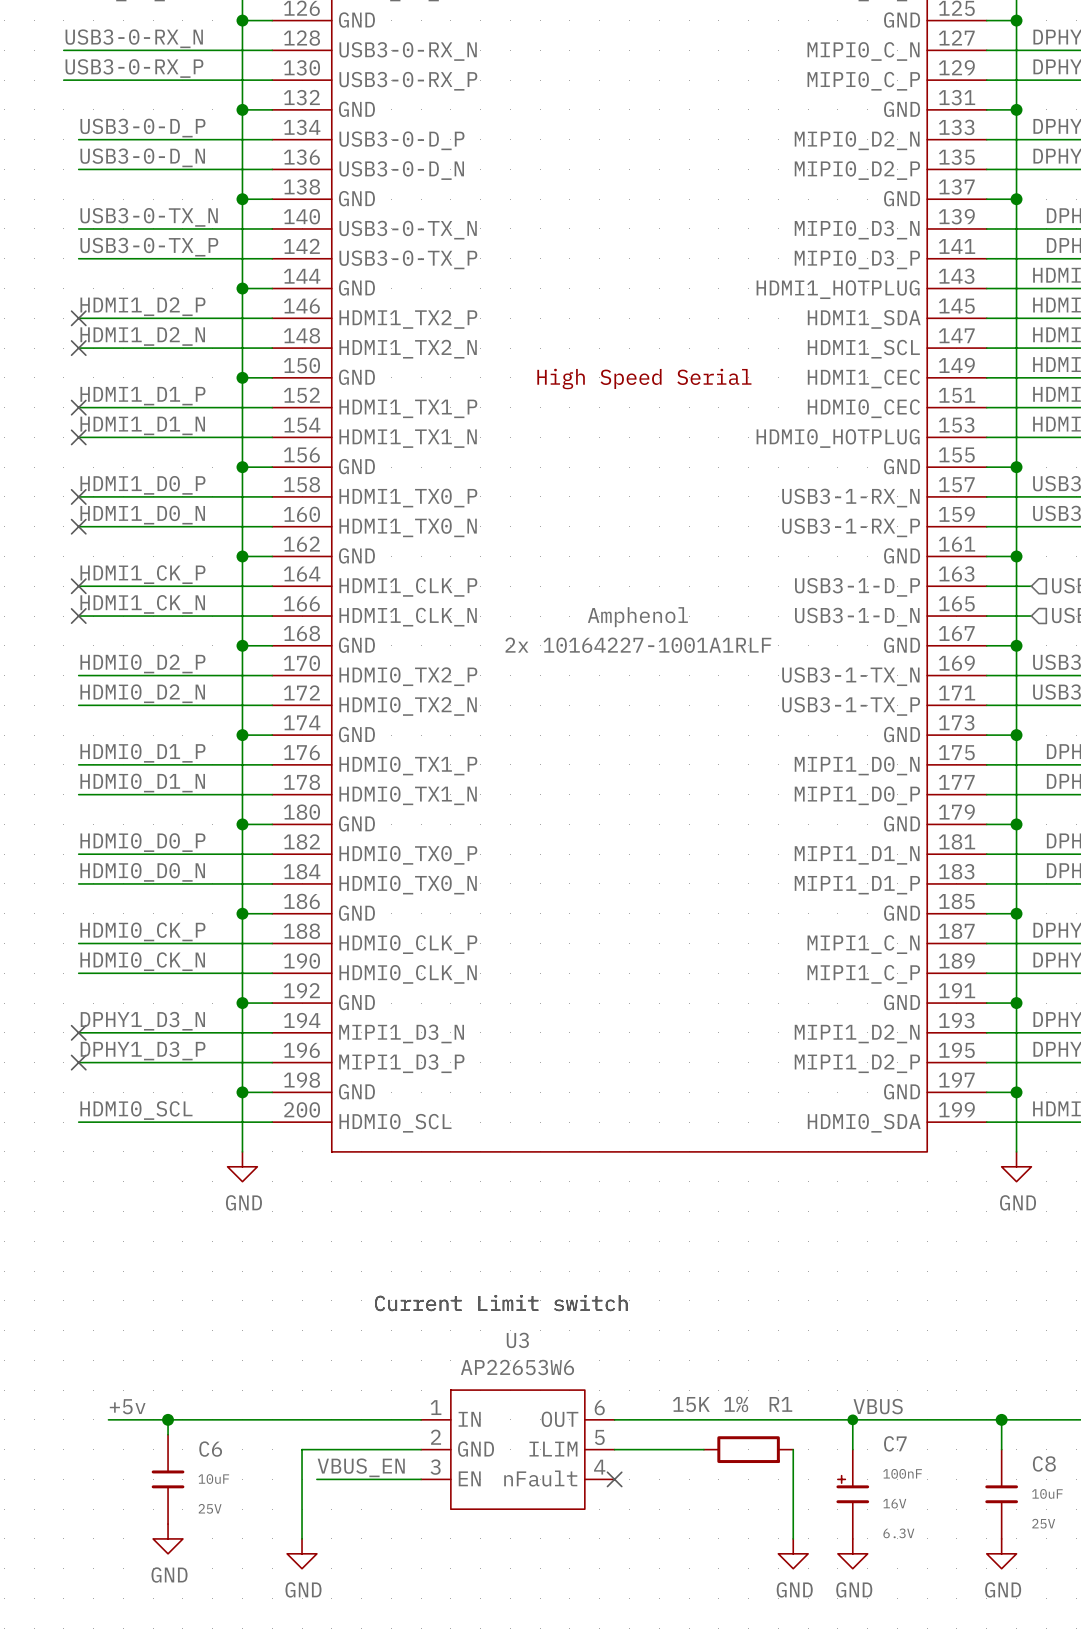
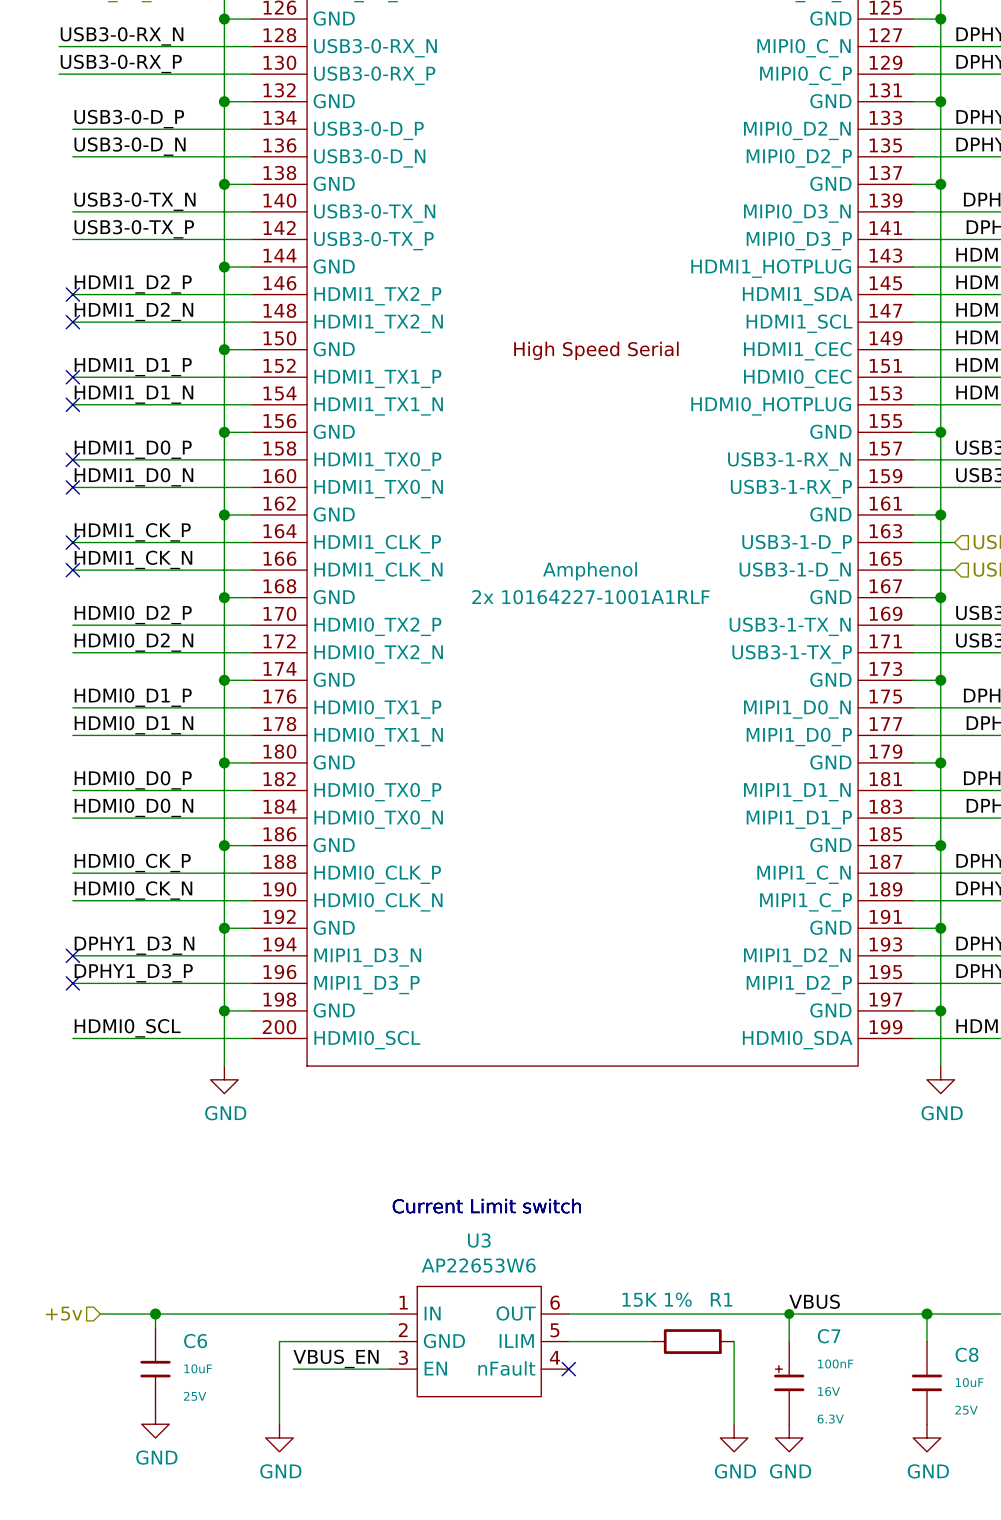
label: +5v (127, 1406) -> none
hierarchical label: none -> +5v (64, 1313)

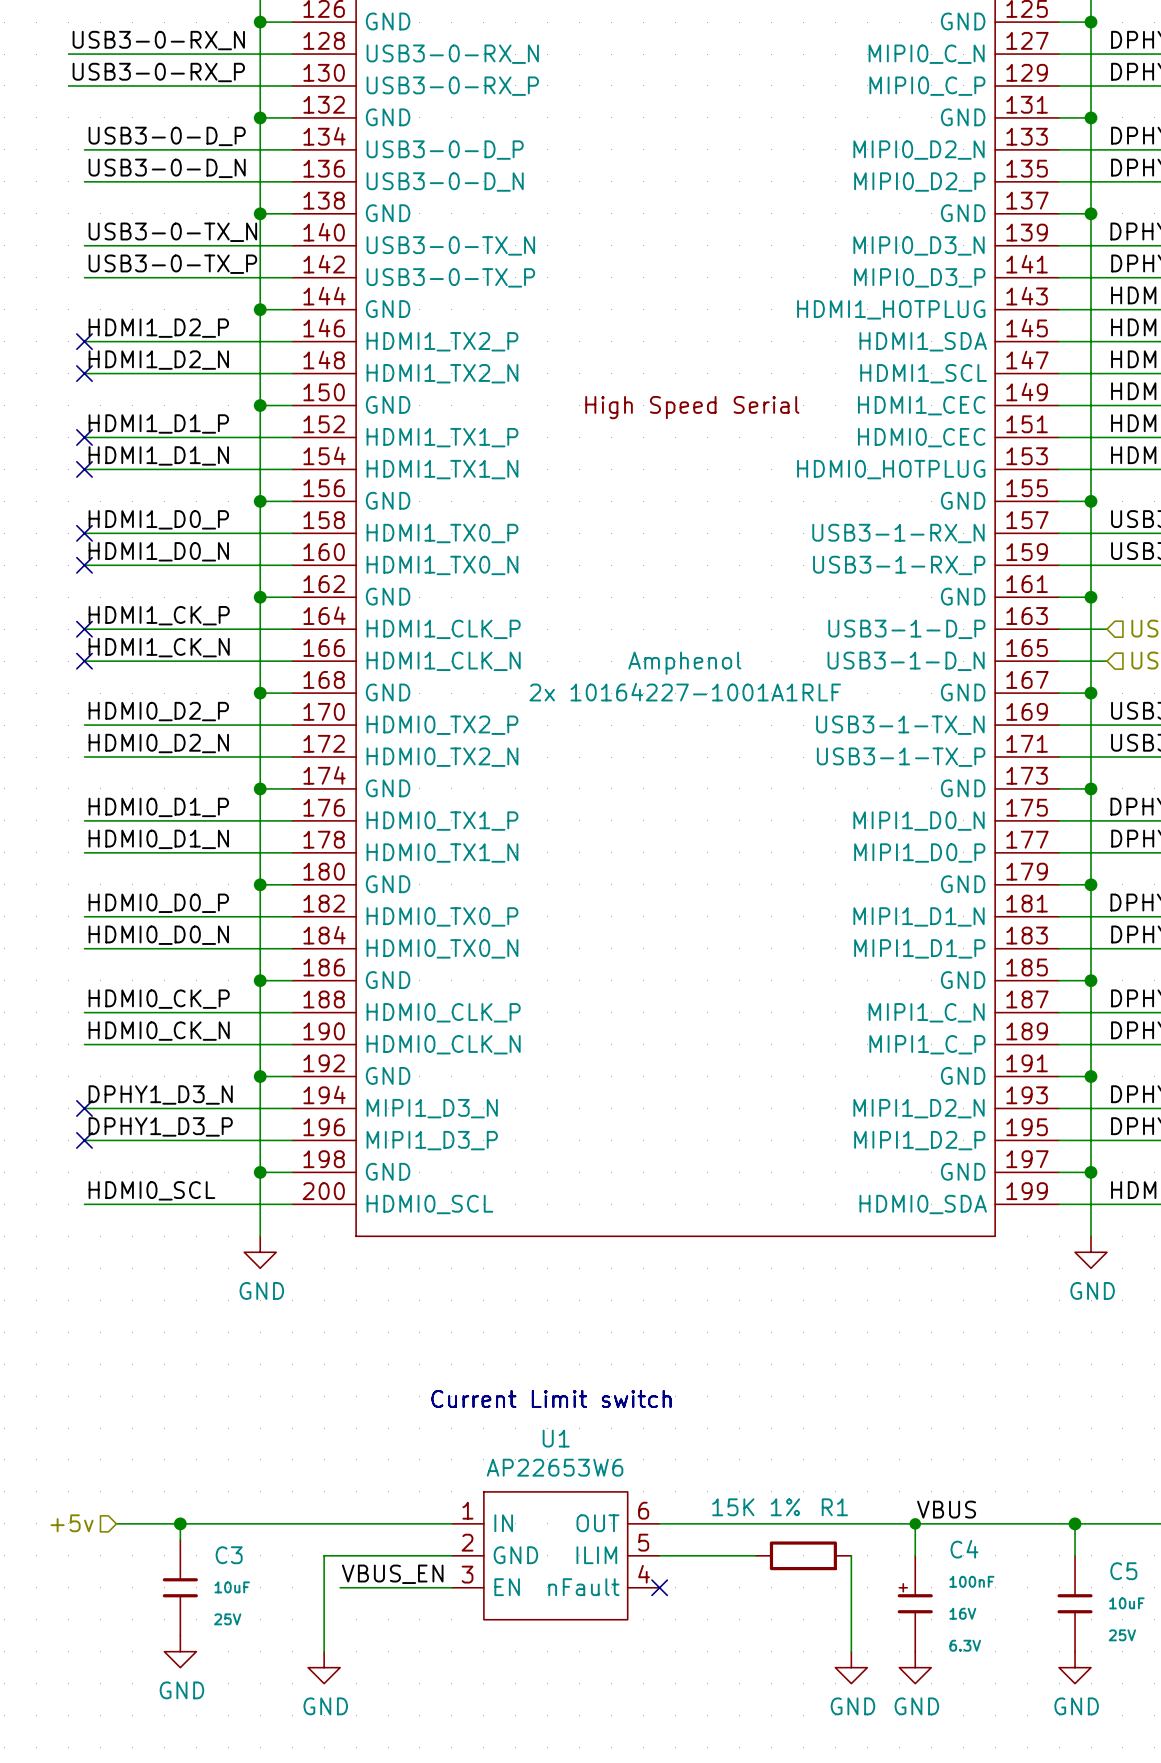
U3 name: U3 (479, 1240) -> U1 (556, 1438)
C7 name: C7 (829, 1336) -> C4 (964, 1549)
C6 name: C6 (195, 1341) -> C3 (229, 1555)
C8 name: C8 (967, 1354) -> C5 (1123, 1571)

